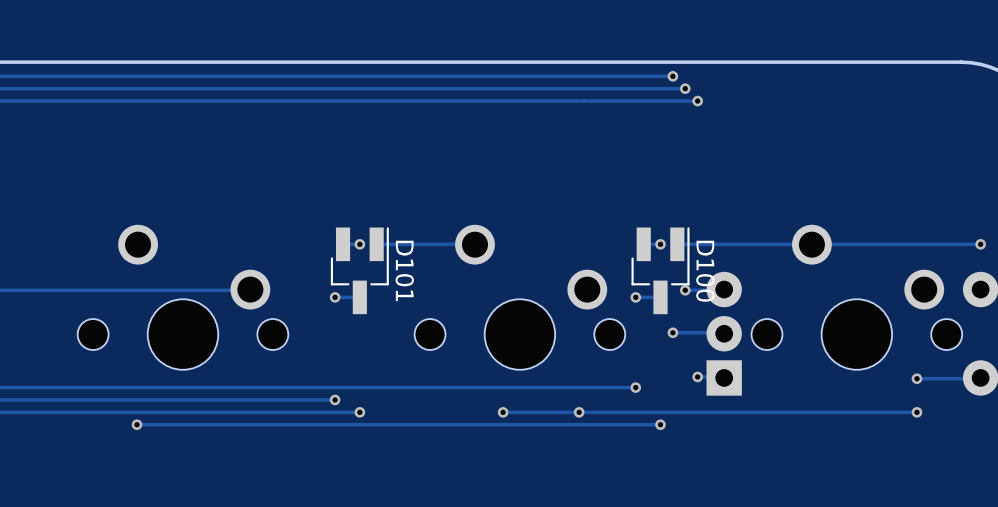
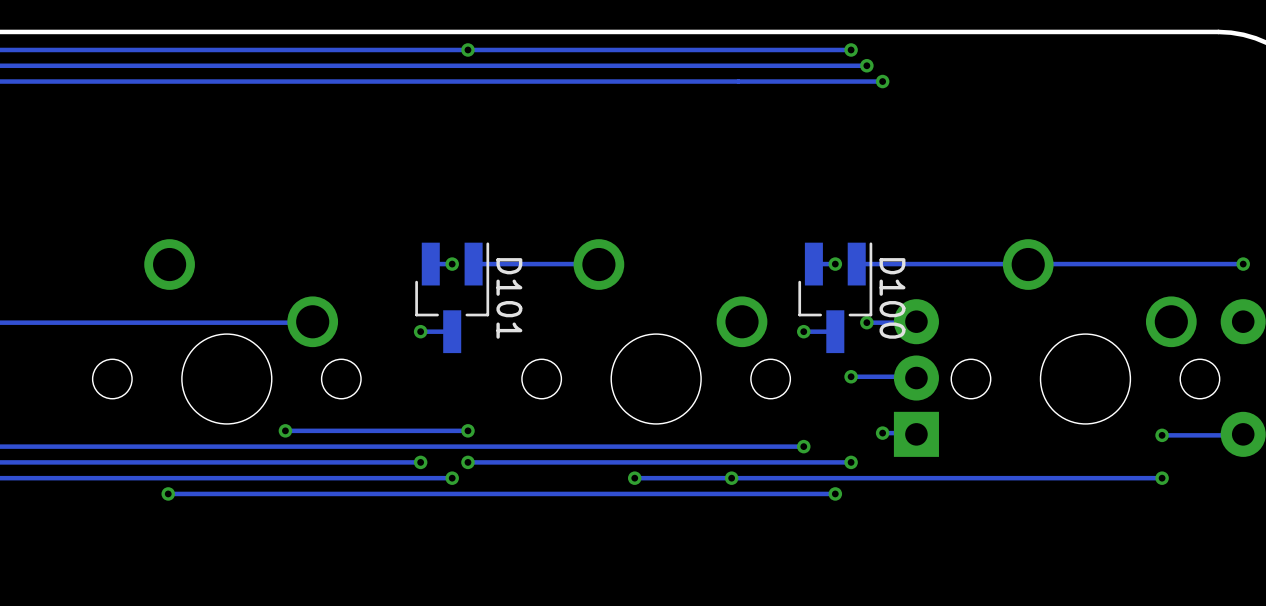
via: none -> (467, 49)
via: none -> (285, 430)
track: none -> (467, 430) (285, 430)
via: none -> (467, 430)
via: none -> (467, 462)
track: none -> (851, 462) (467, 462)
via: none -> (851, 462)

